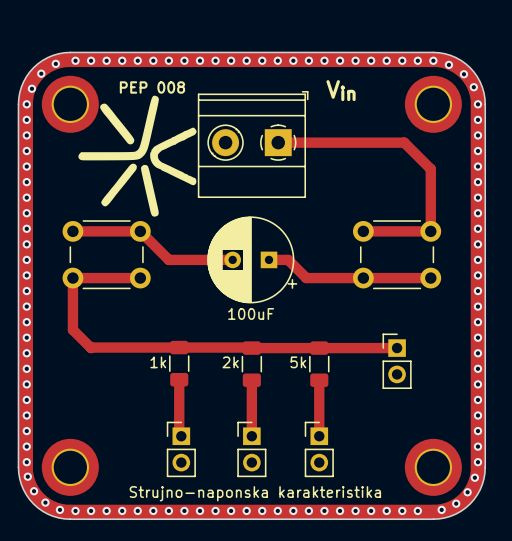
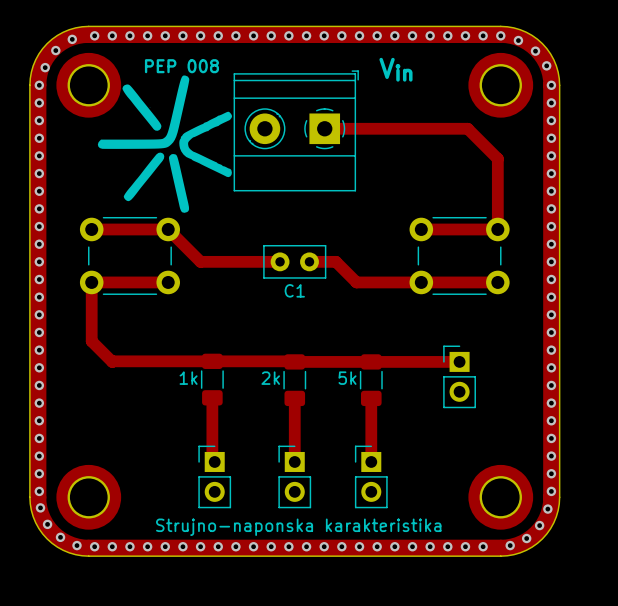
C1: none -> (294, 261)
100uF: (252, 259) -> none

